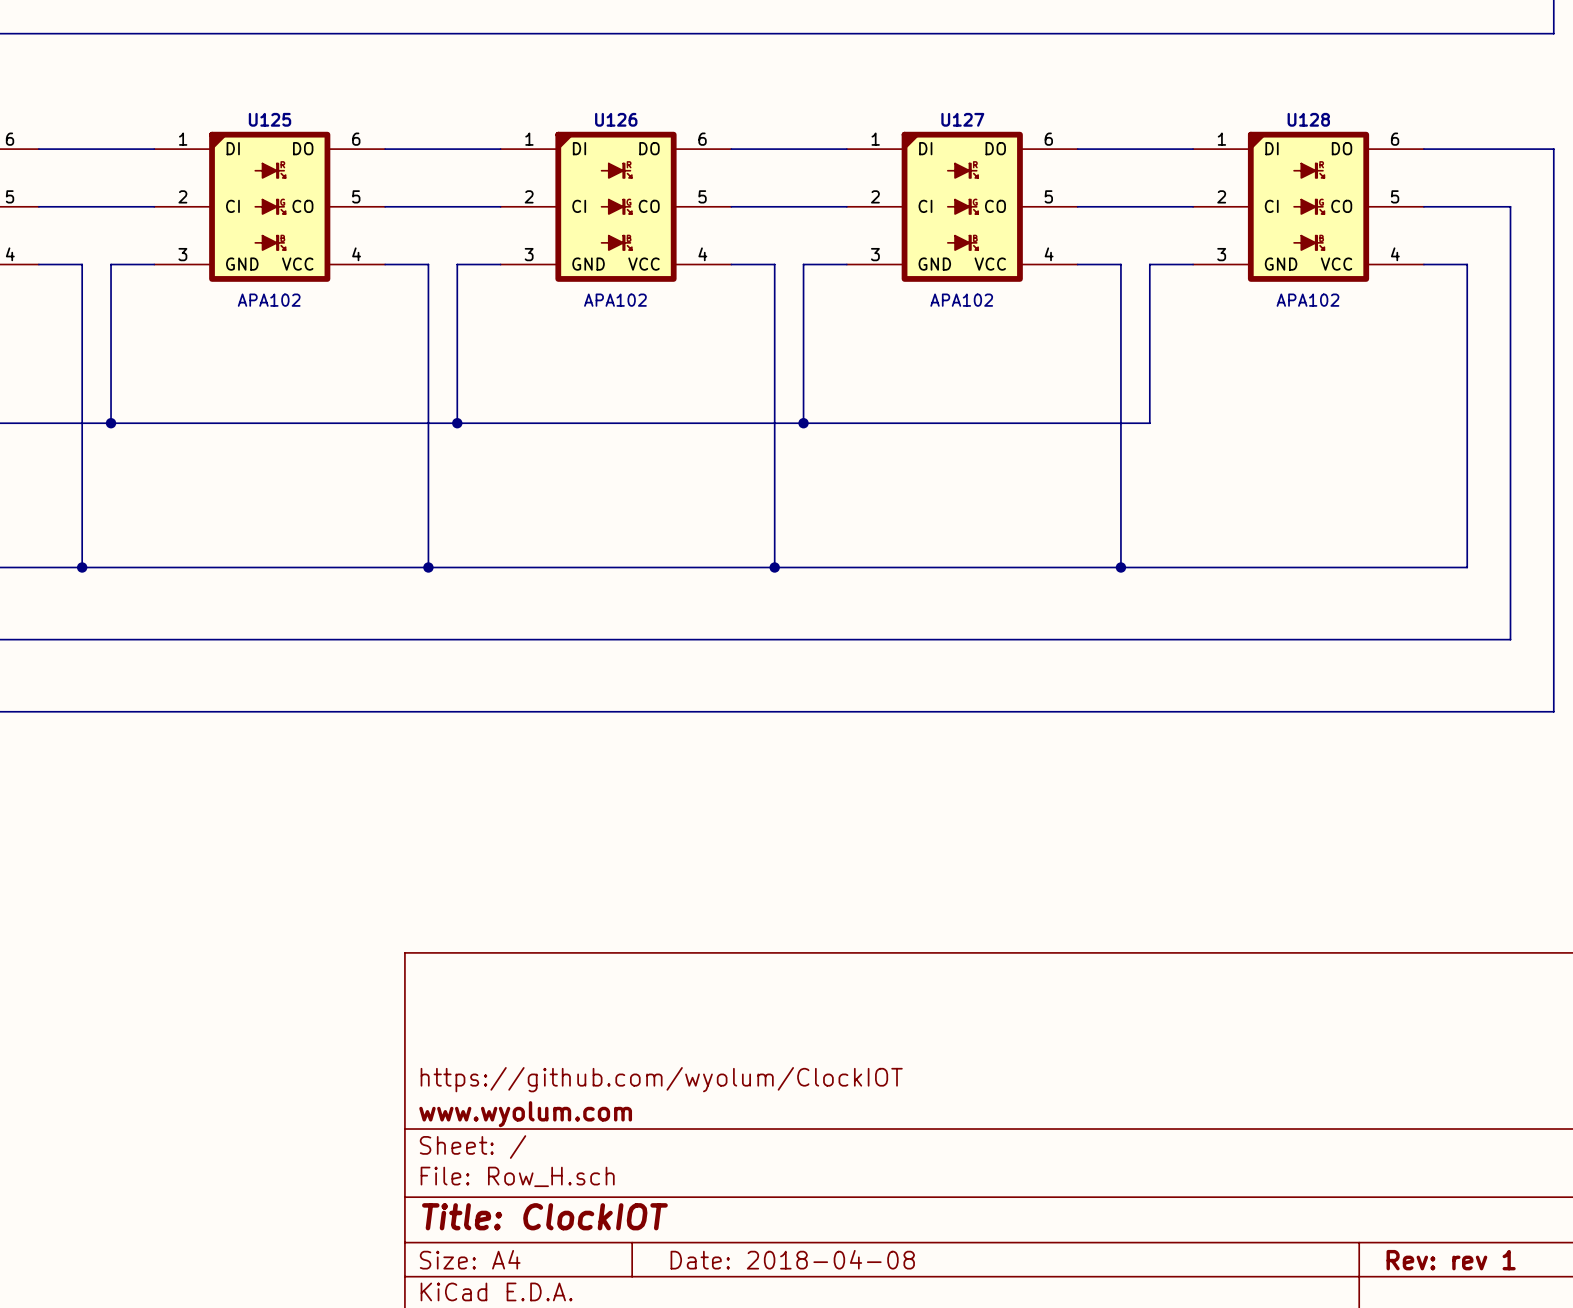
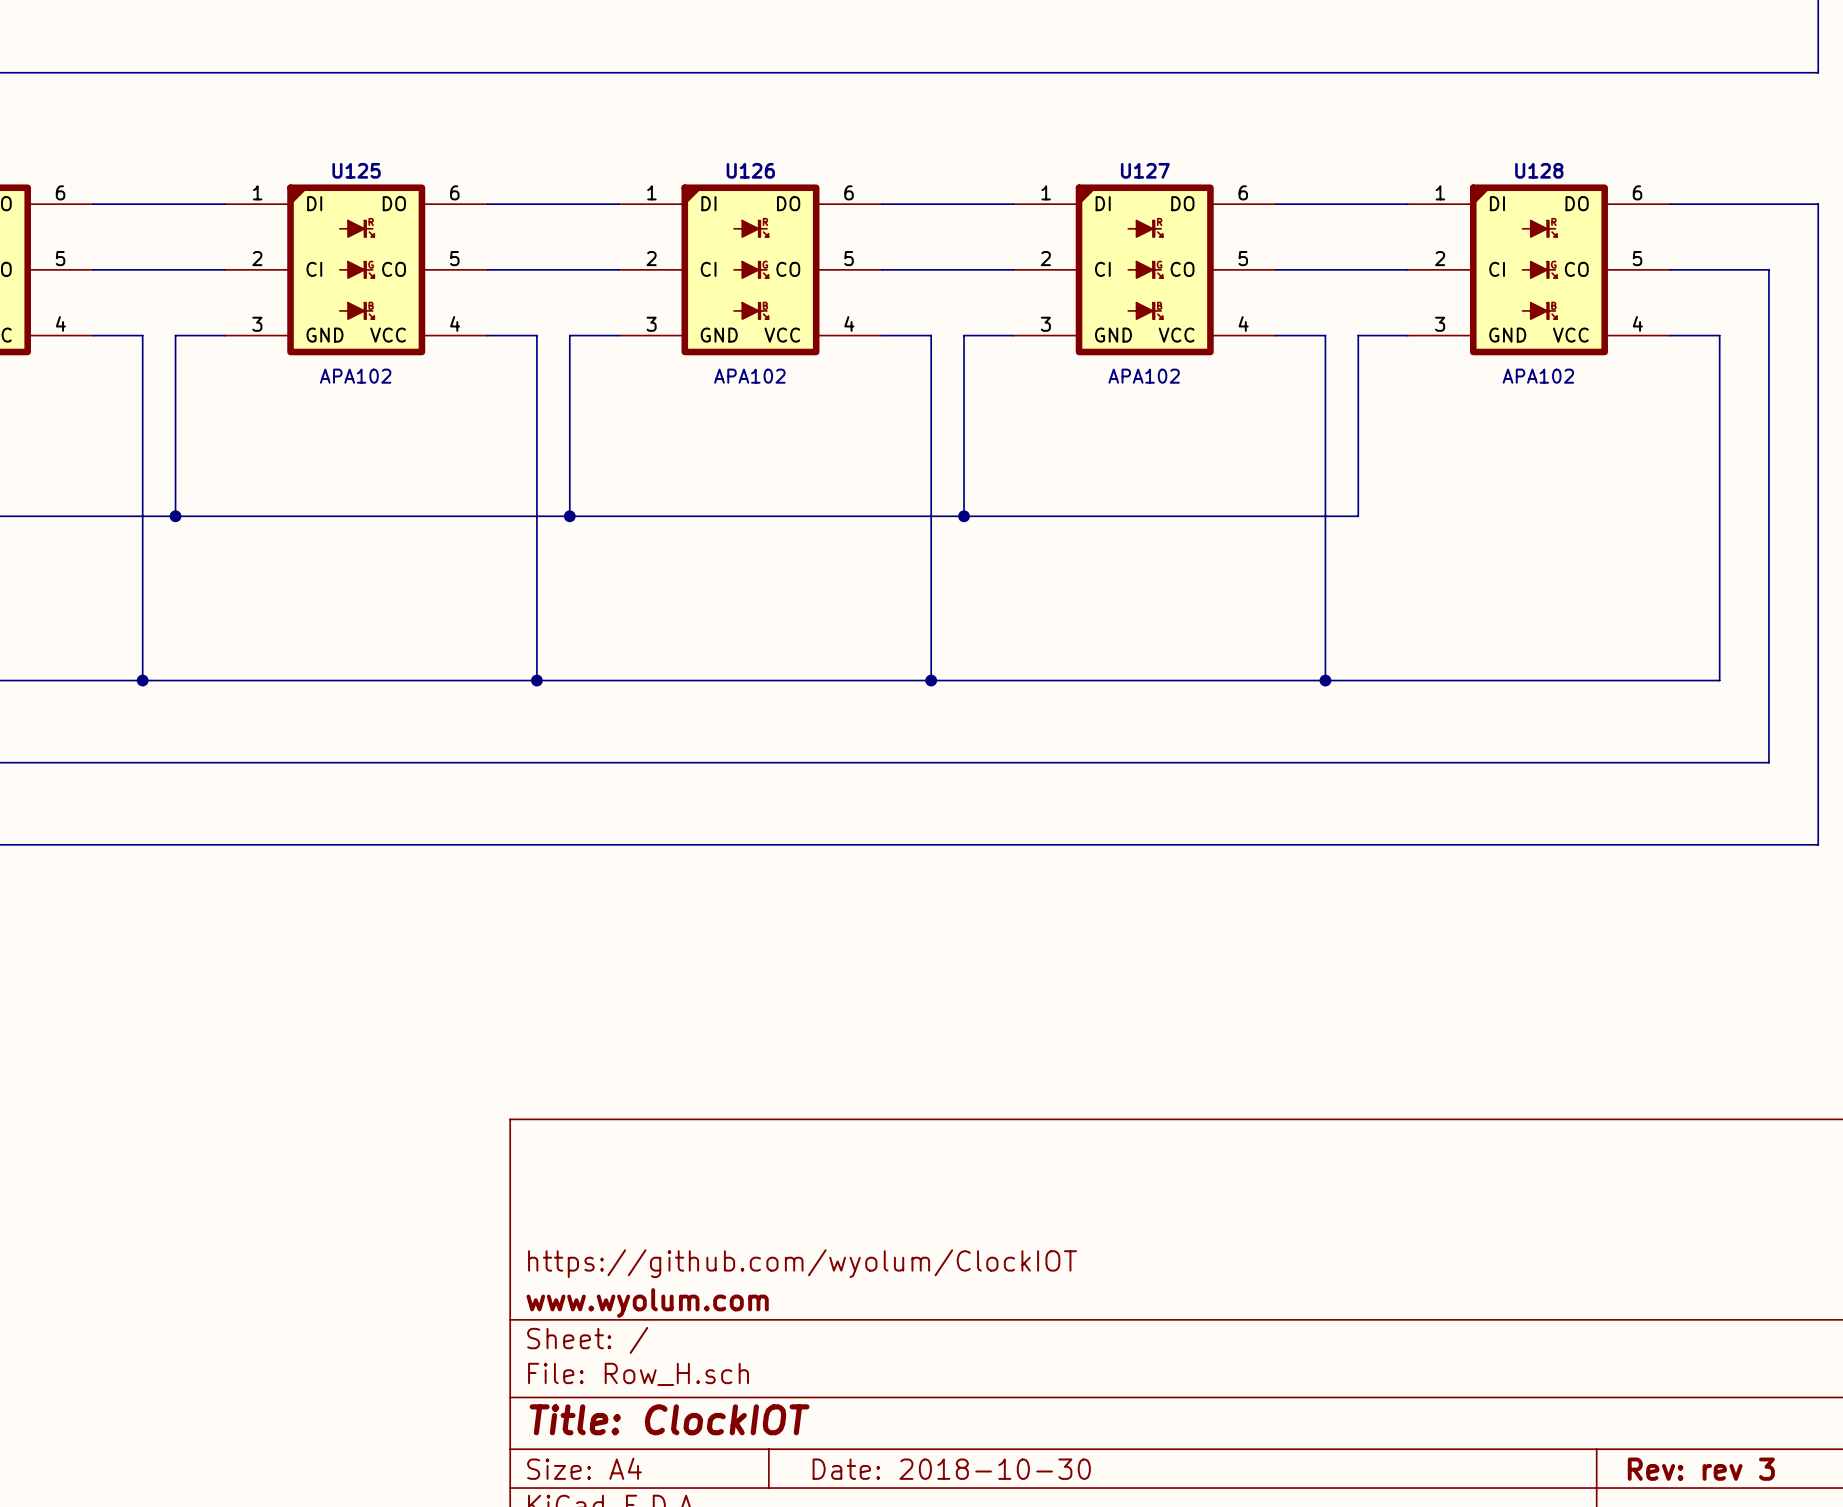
title block: Date: 2018-04-08 (792, 1259) -> Date: 2018-10-30 (951, 1469)
title block: Rev: rev 1 (1451, 1260) -> Rev: rev 3 (1701, 1469)

